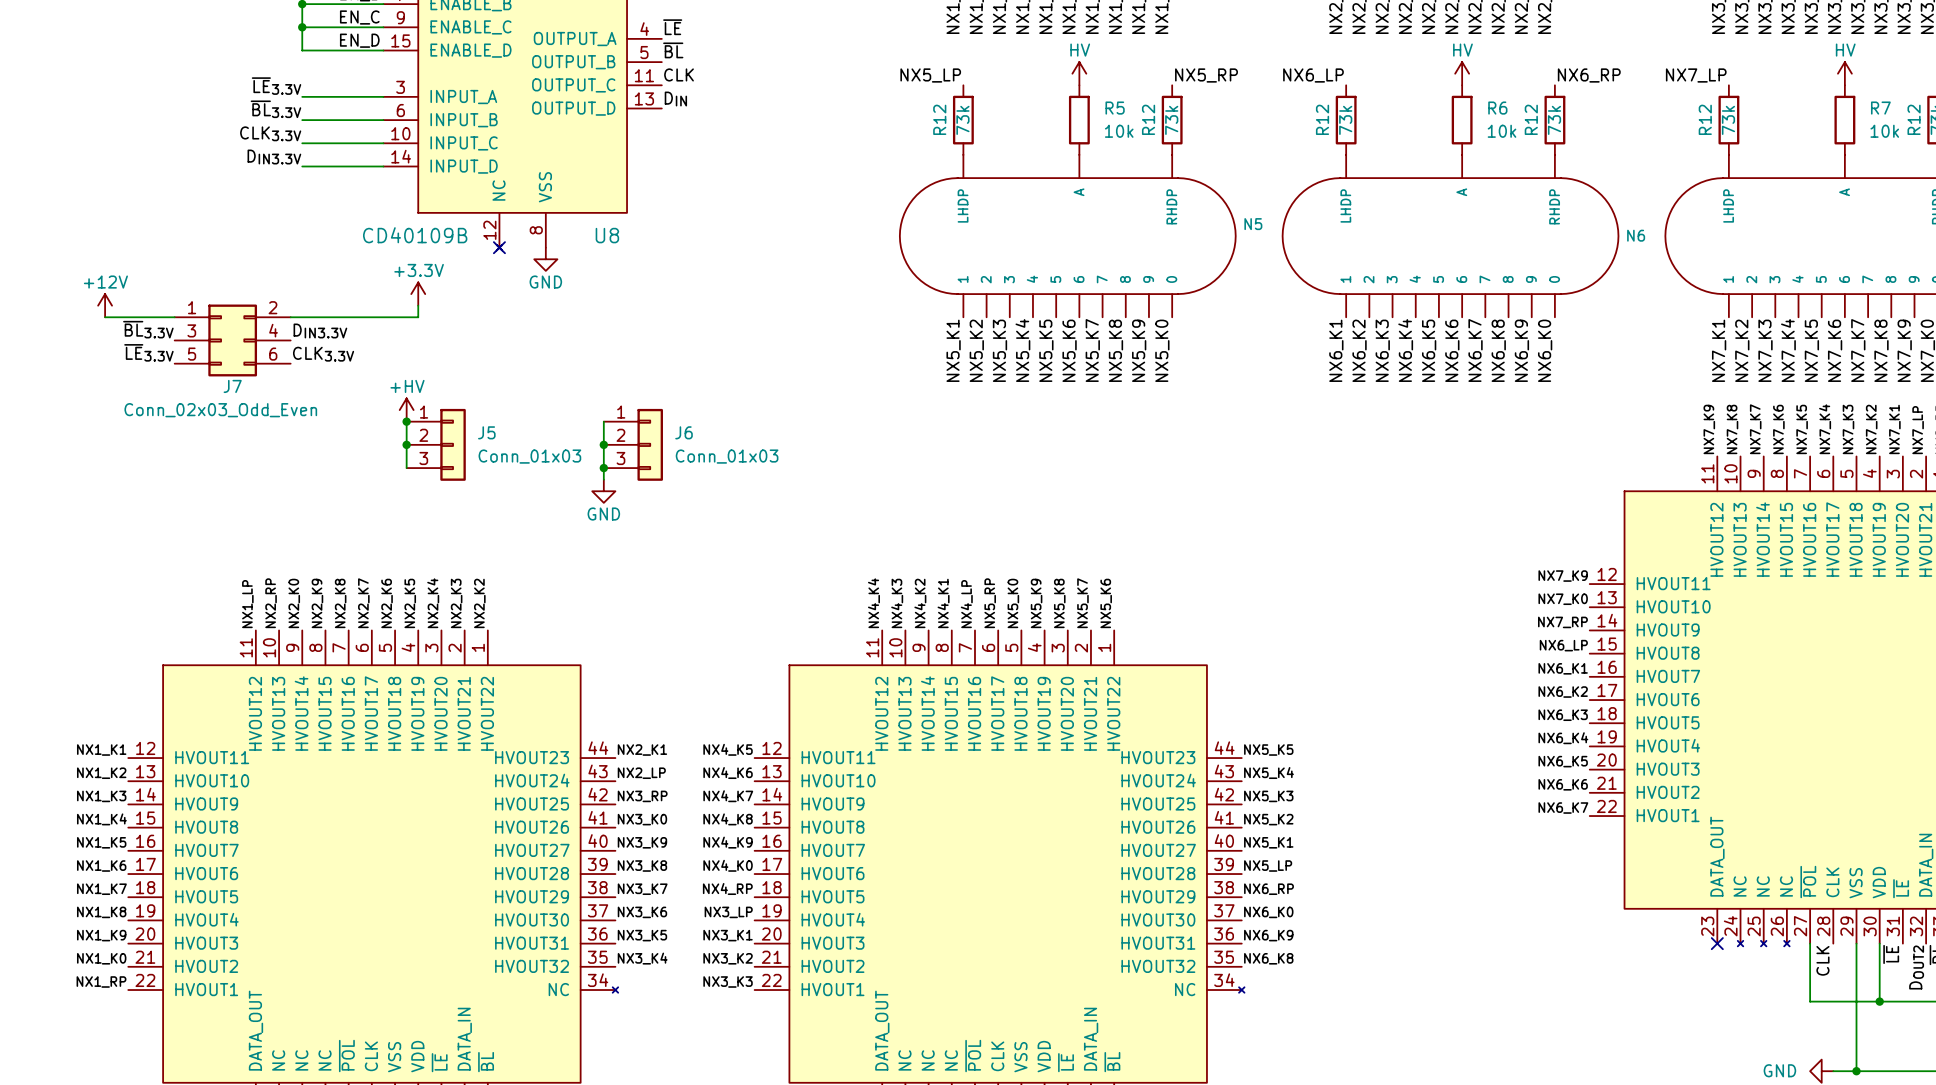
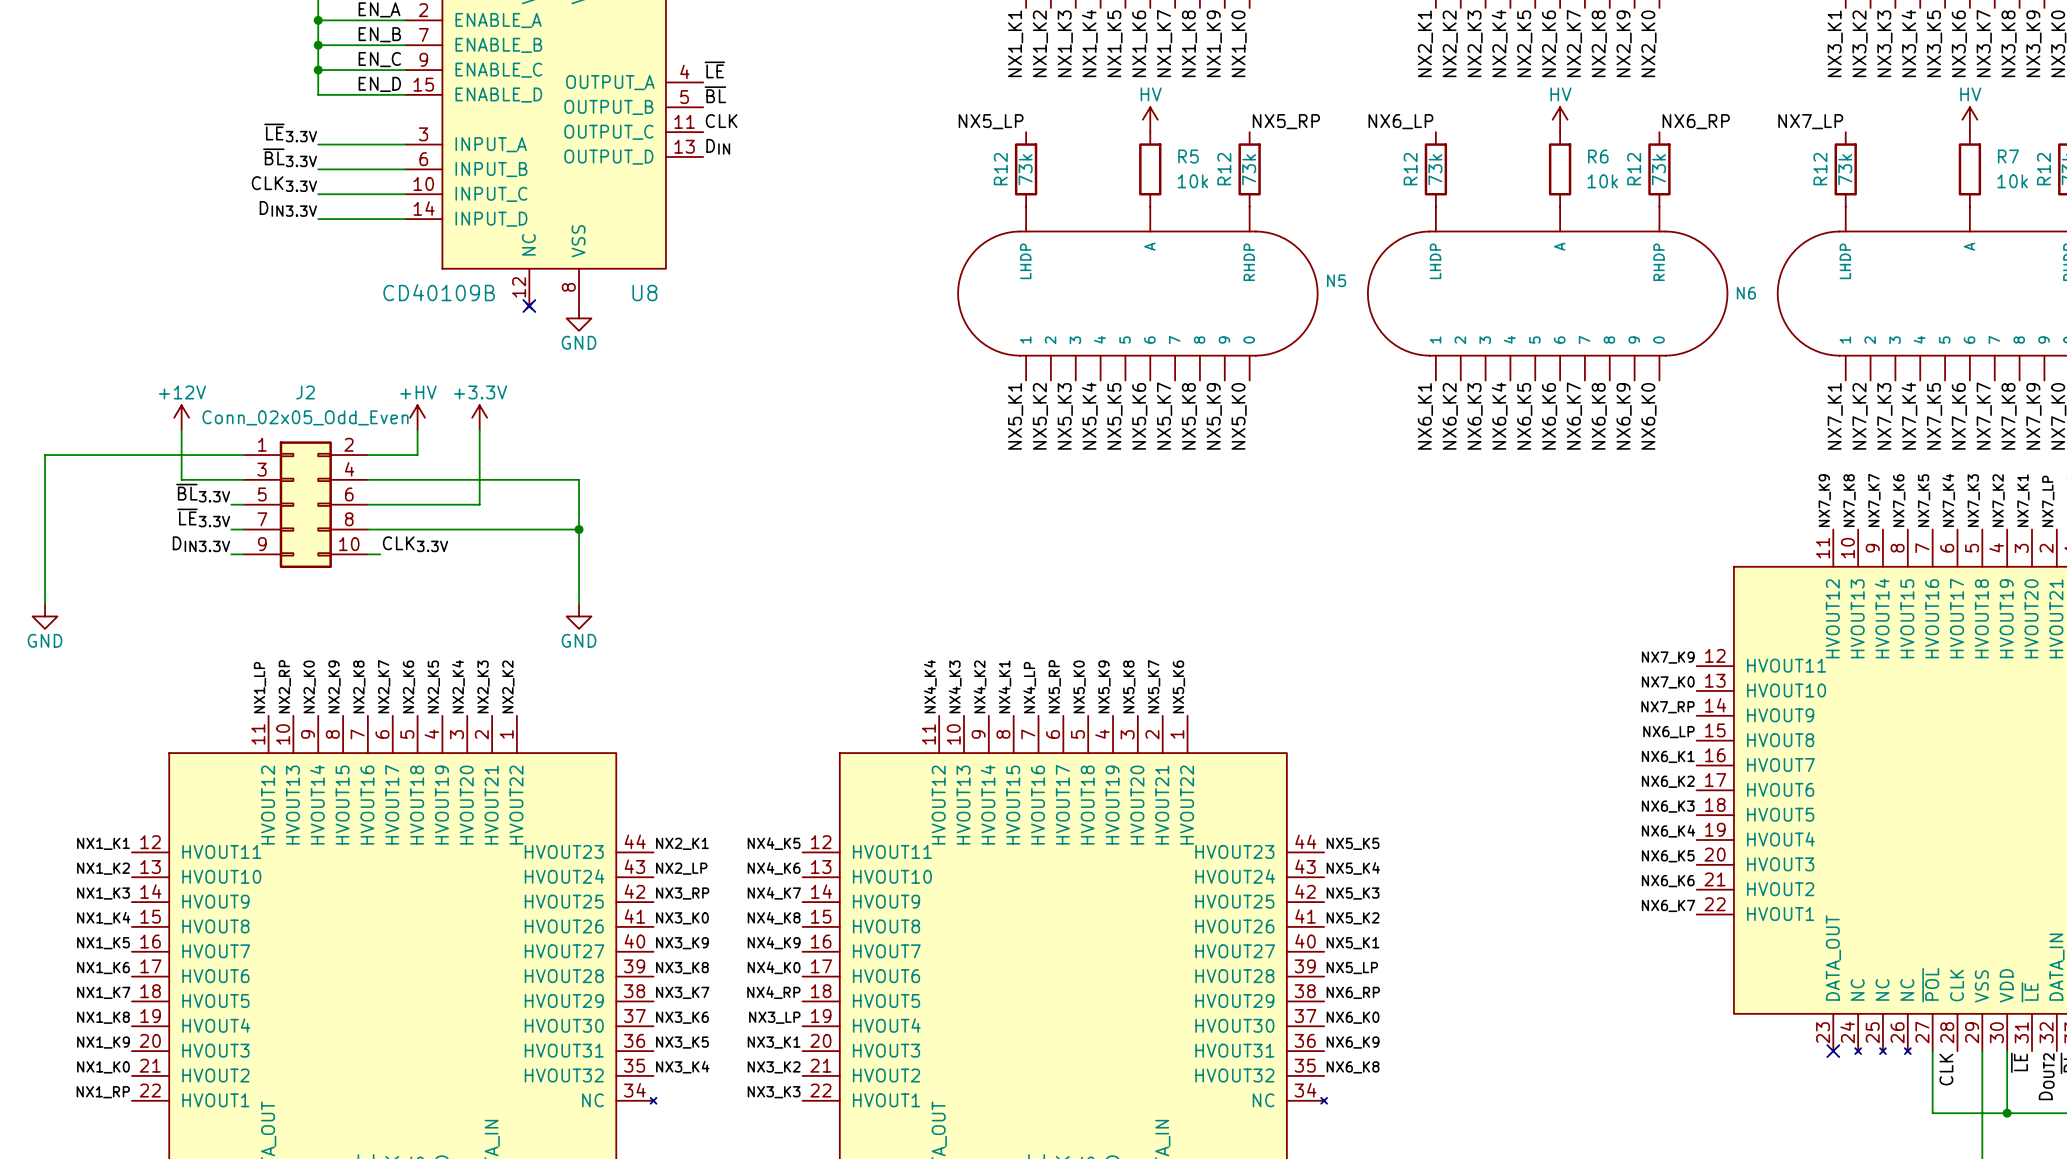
power symbol position: +3.3V (418, 294) -> +3.3V (479, 417)
power symbol position: +12V (105, 305) -> +12V (181, 417)
wire: (418, 305) (418, 317) (290, 317) -> none
wire: (105, 317) (174, 317) -> none
label position: ~{BL}3.3V (148, 329) -> ~{BL}3.3V (203, 493)
label position: DIN3.3V (320, 330) -> DIN3.3V (201, 544)
J7: Conn_02x03_Odd_Even (232, 340) -> none
label position: ~{LE}3.3V (148, 352) -> ~{LE}3.3V (203, 517)
label position: CLK3.3V (323, 354) -> CLK3.3V (415, 544)
wire: none -> (181, 430) (181, 479) (243, 479)
wire: none -> (417, 430) (417, 455) (367, 455)
wire: none -> (479, 430) (479, 504) (367, 504)
wire: none -> (243, 455) (45, 455) (45, 604)
wire: none -> (367, 479) (579, 479) (579, 604)
power symbol position: +HV (406, 410) -> +HV (417, 417)
wire: (406, 421) (406, 468) -> none
junction: (406, 421) -> none
wire: (603, 421) (603, 479) -> none
wire: none -> (231, 504) (243, 504)
J2: none -> Conn_02x05_Odd_Even (305, 504)
junction: (406, 444) -> none
J5: Conn_01x03 (436, 444) -> none
junction: (603, 444) -> none
J6: Conn_01x03 (633, 444) -> none
wire: none -> (231, 529) (243, 529)
wire: none -> (367, 529) (579, 529)
junction: none -> (579, 529)
junction: (603, 468) -> none
wire: none -> (231, 554) (243, 554)
wire: none -> (367, 554) (380, 554)
power symbol position: GND (603, 491) -> GND (579, 616)
power symbol: none -> GND (45, 616)

